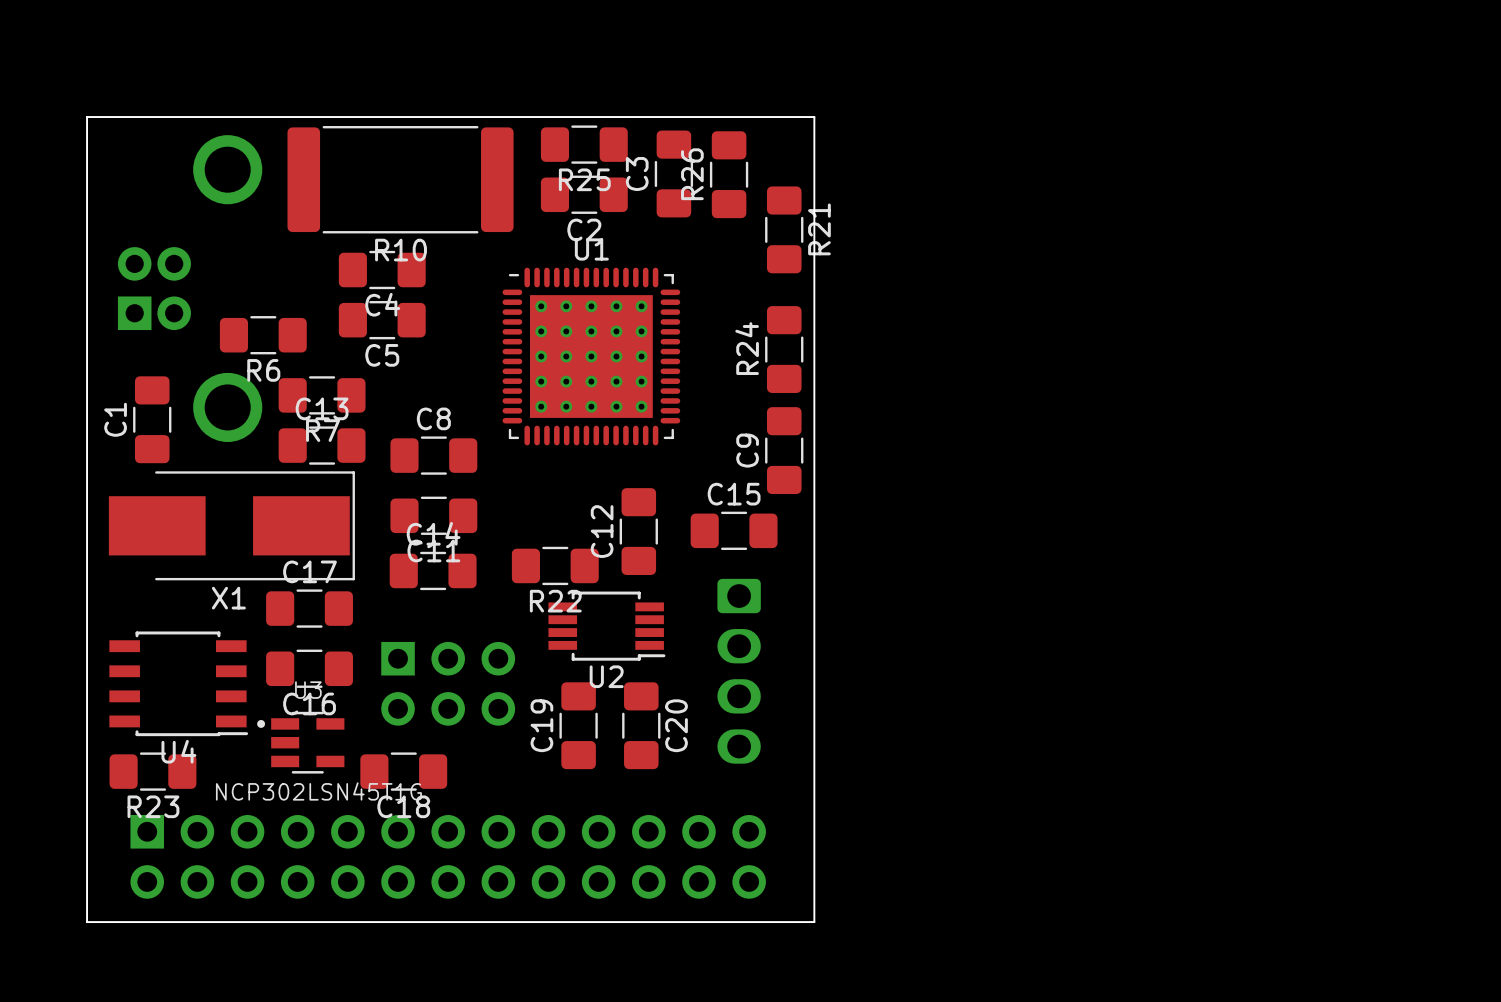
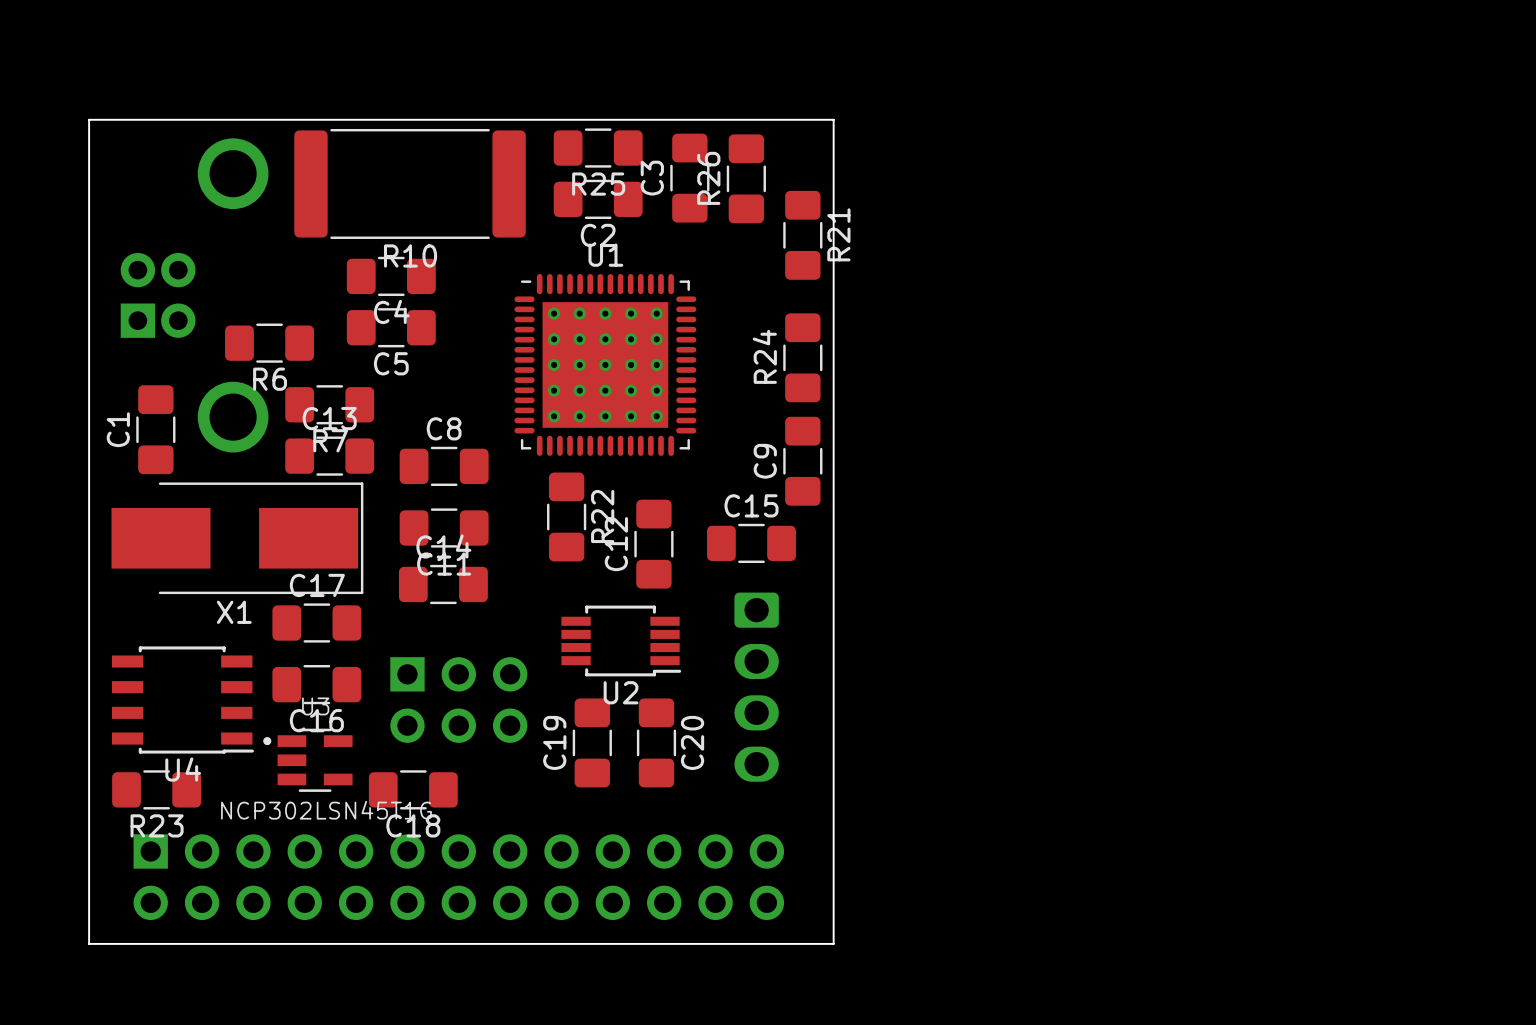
R22 rotation: 0° (555, 565) -> 90° clockwise (566, 516)
R22 position: (555, 565) -> (566, 516)
R22 name position: R22 (555, 601) -> R22 (602, 516)

